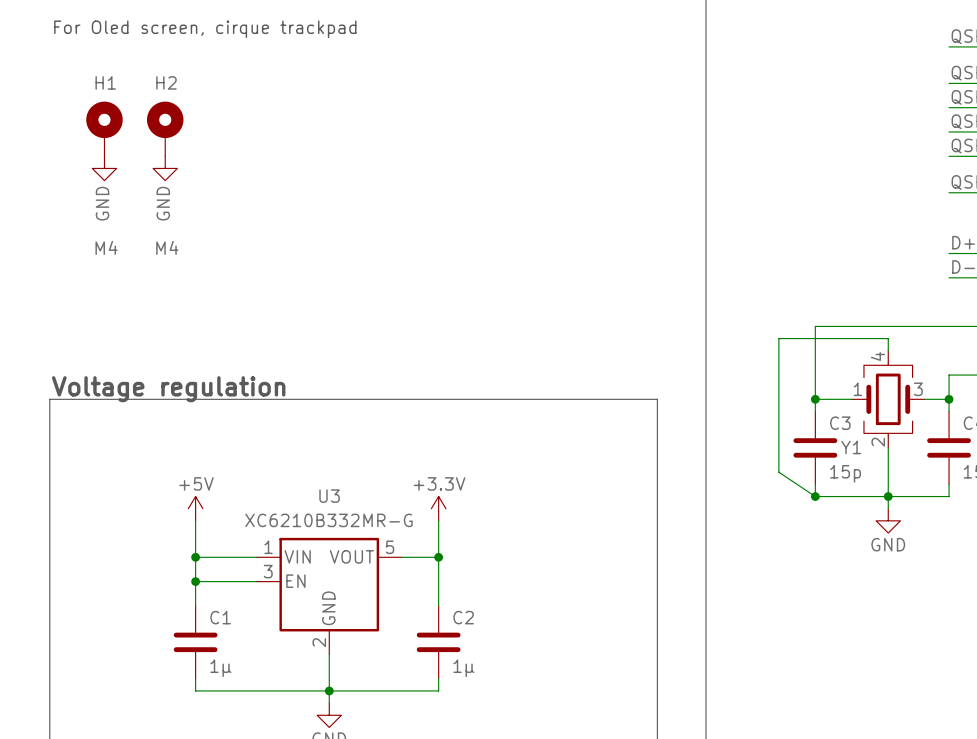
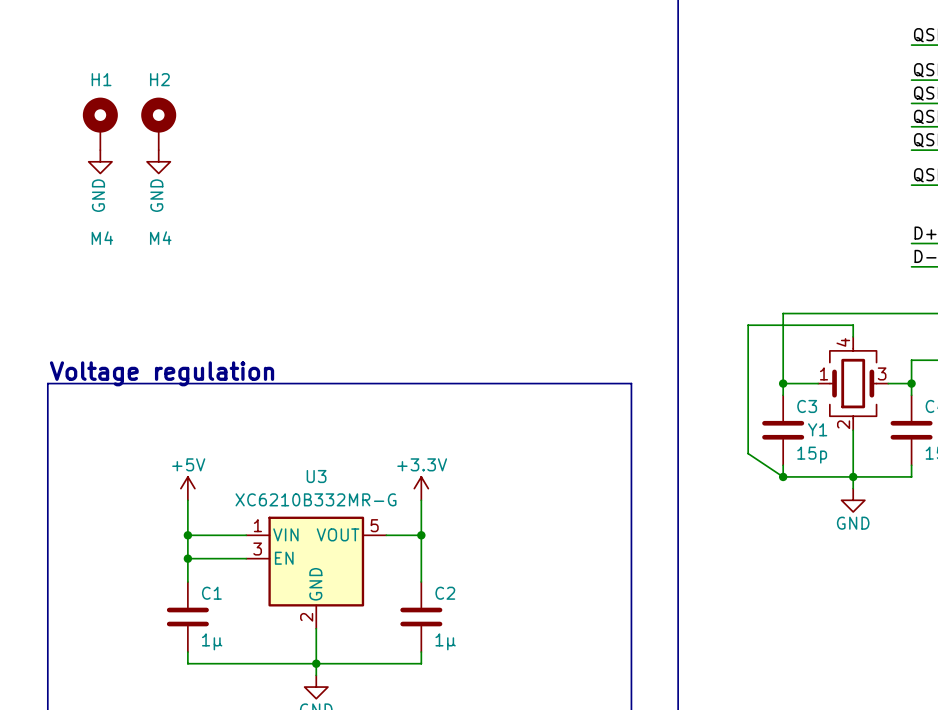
text: For Oled screen, cirque trackpad (205, 29) -> none

